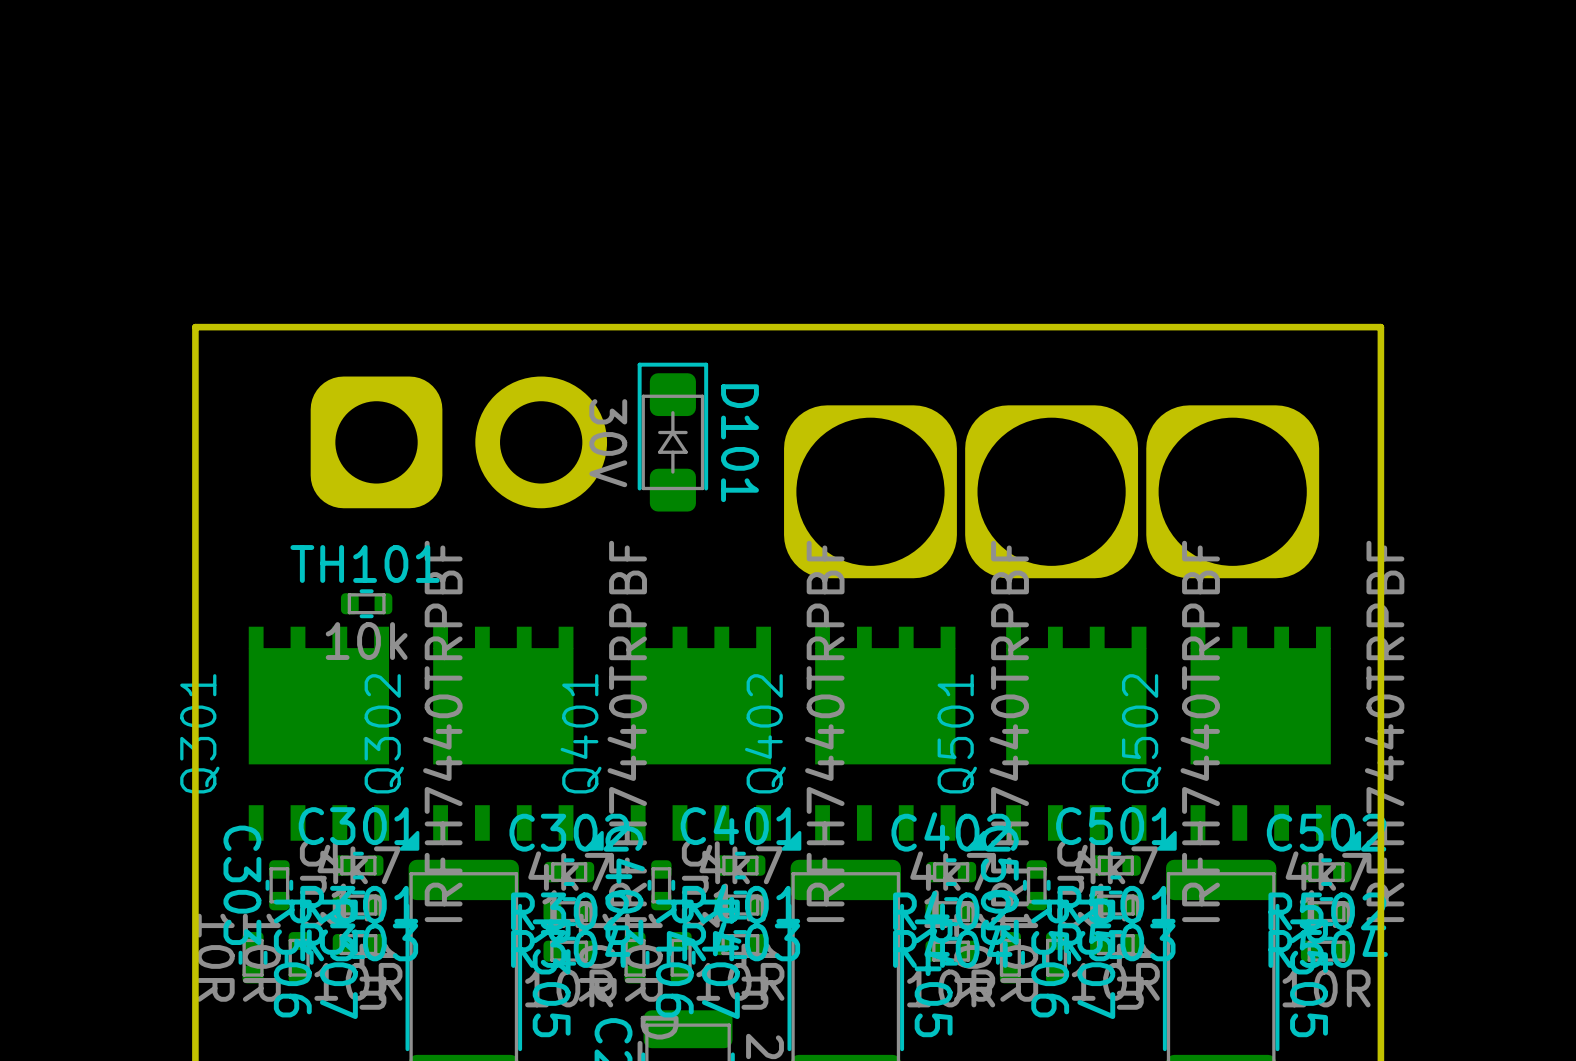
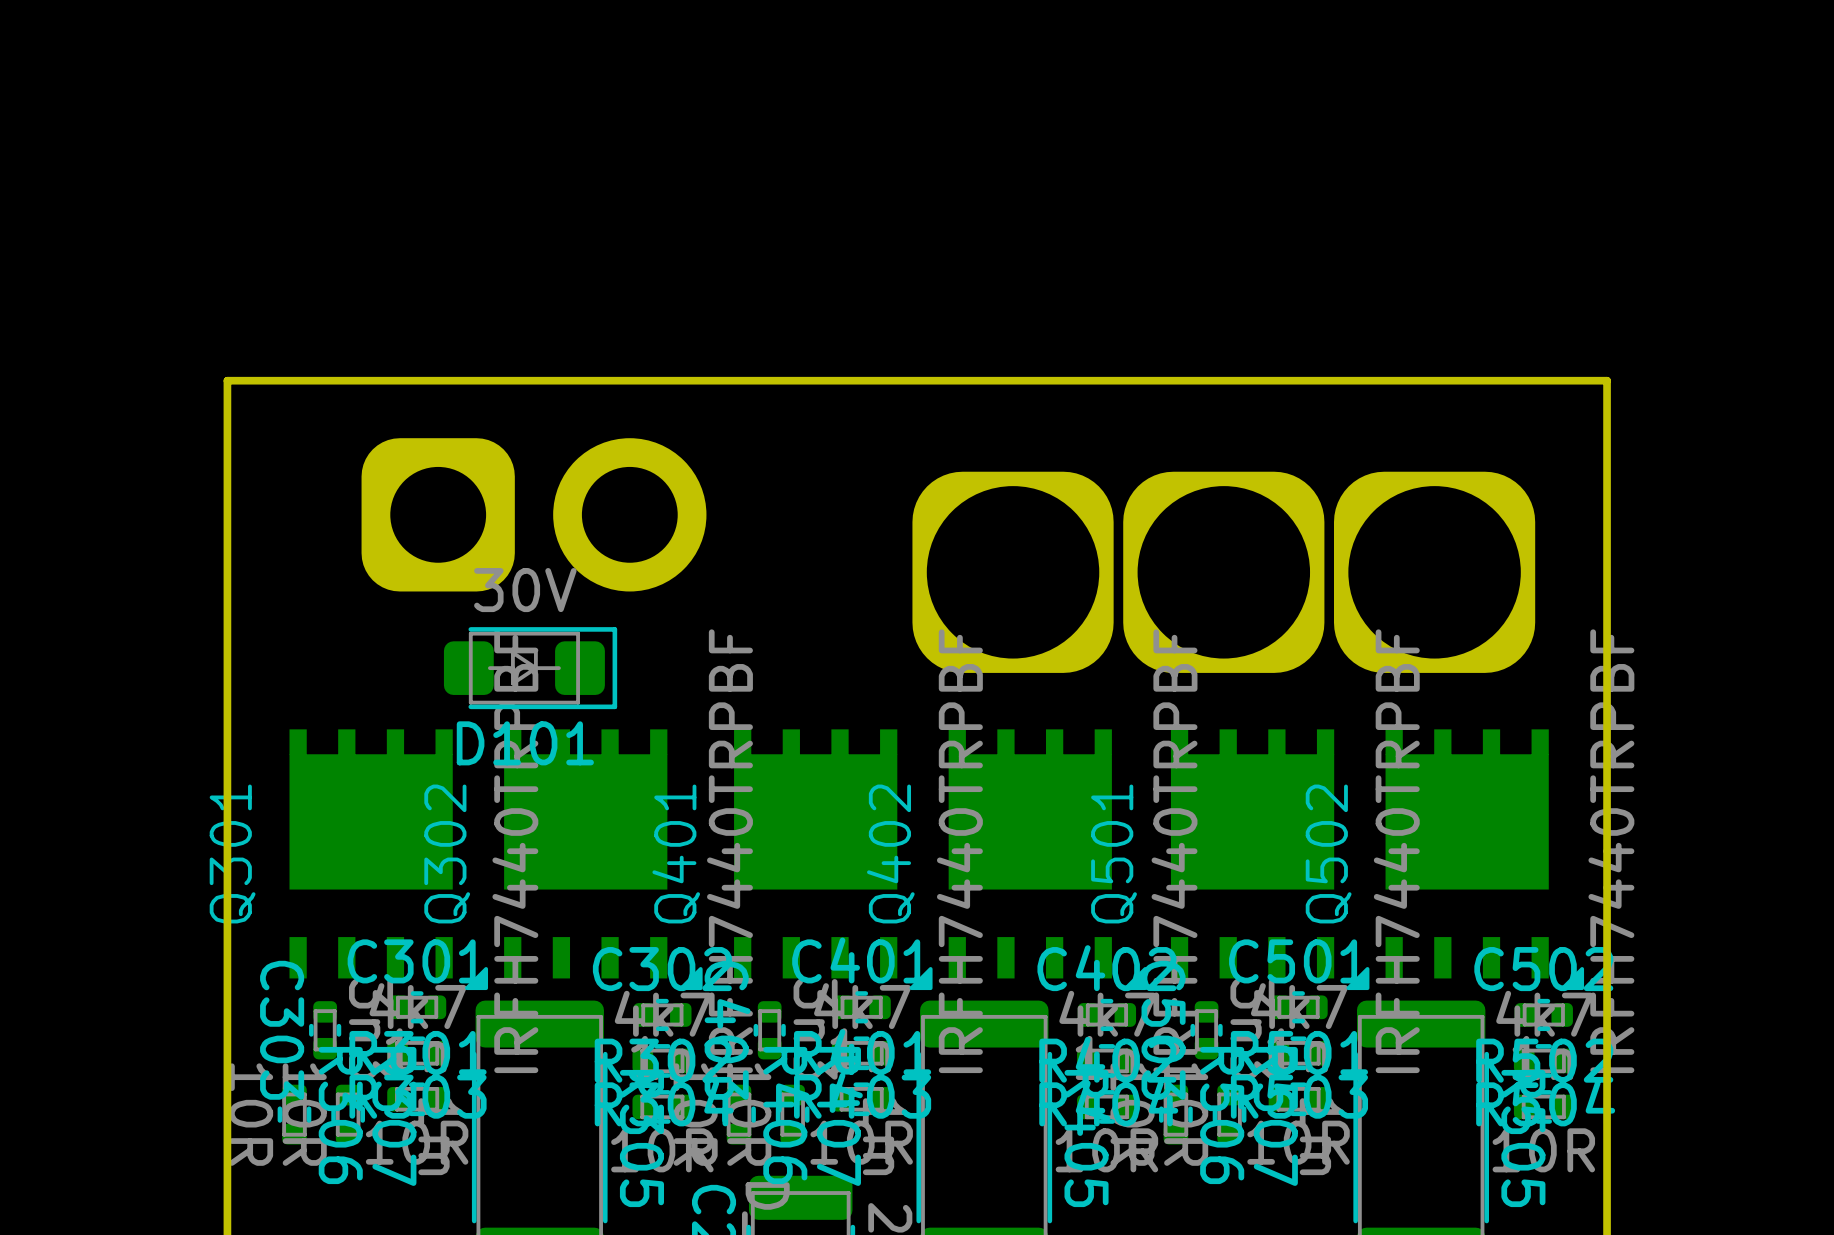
D101 rotation: 0° (672, 437) -> 90° clockwise (530, 668)
D101 position: (672, 437) -> (530, 668)
TH101: 10k (366, 603) -> none

